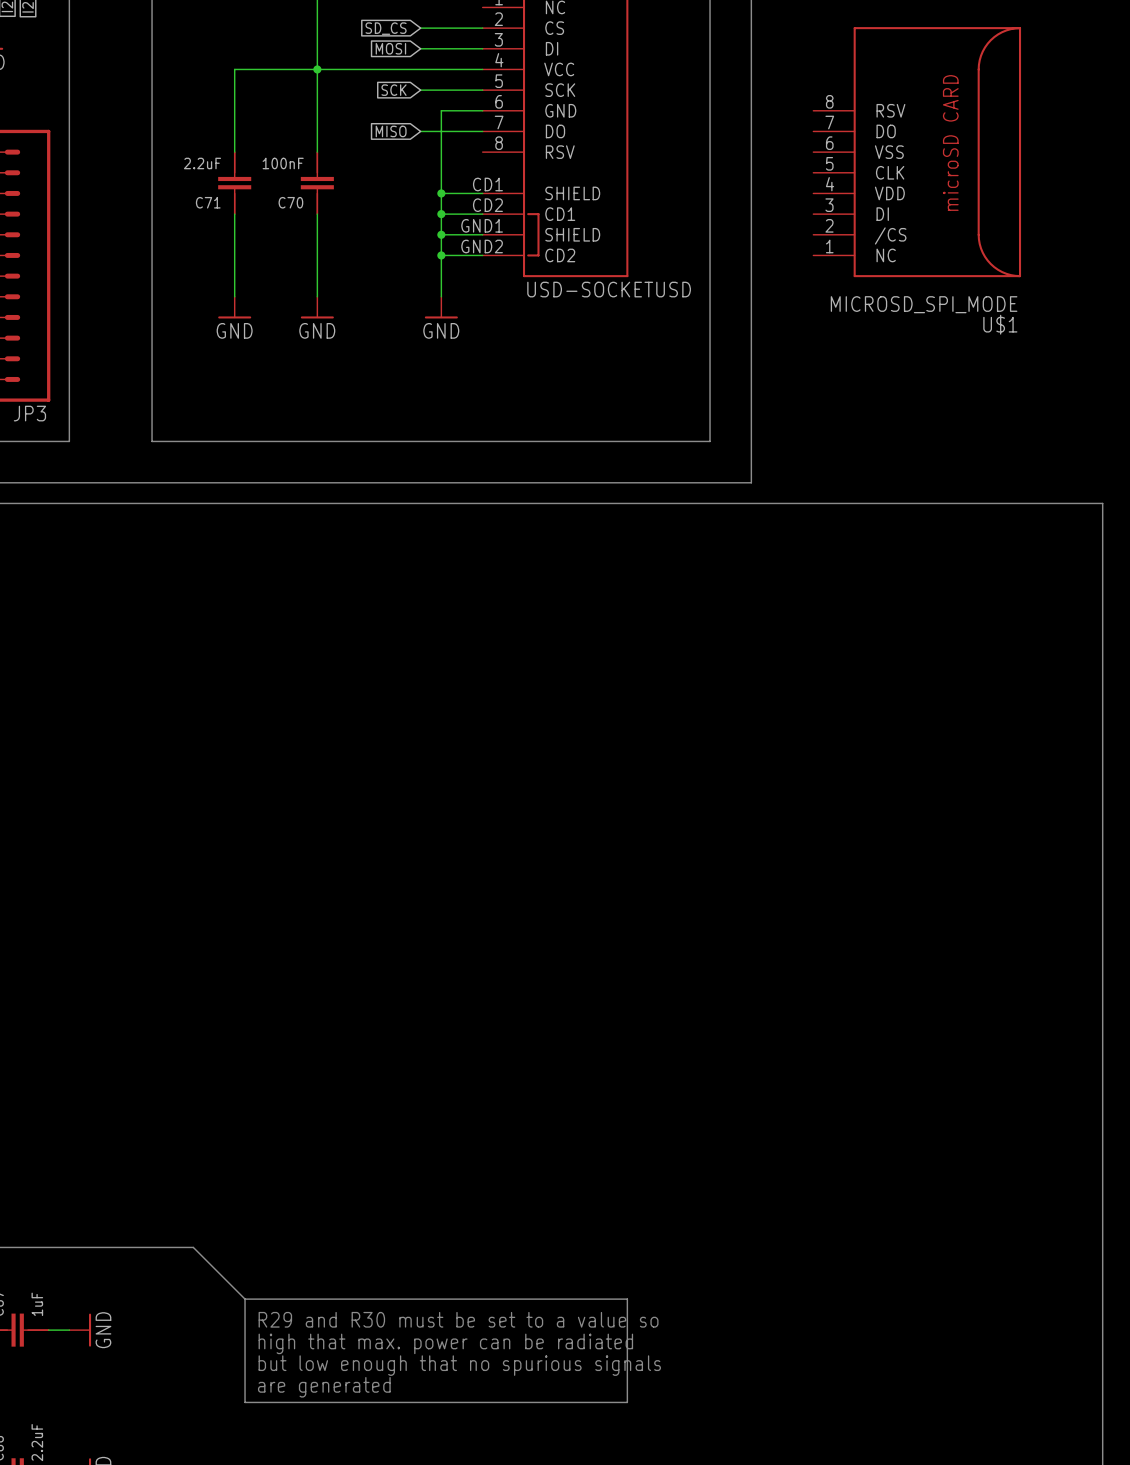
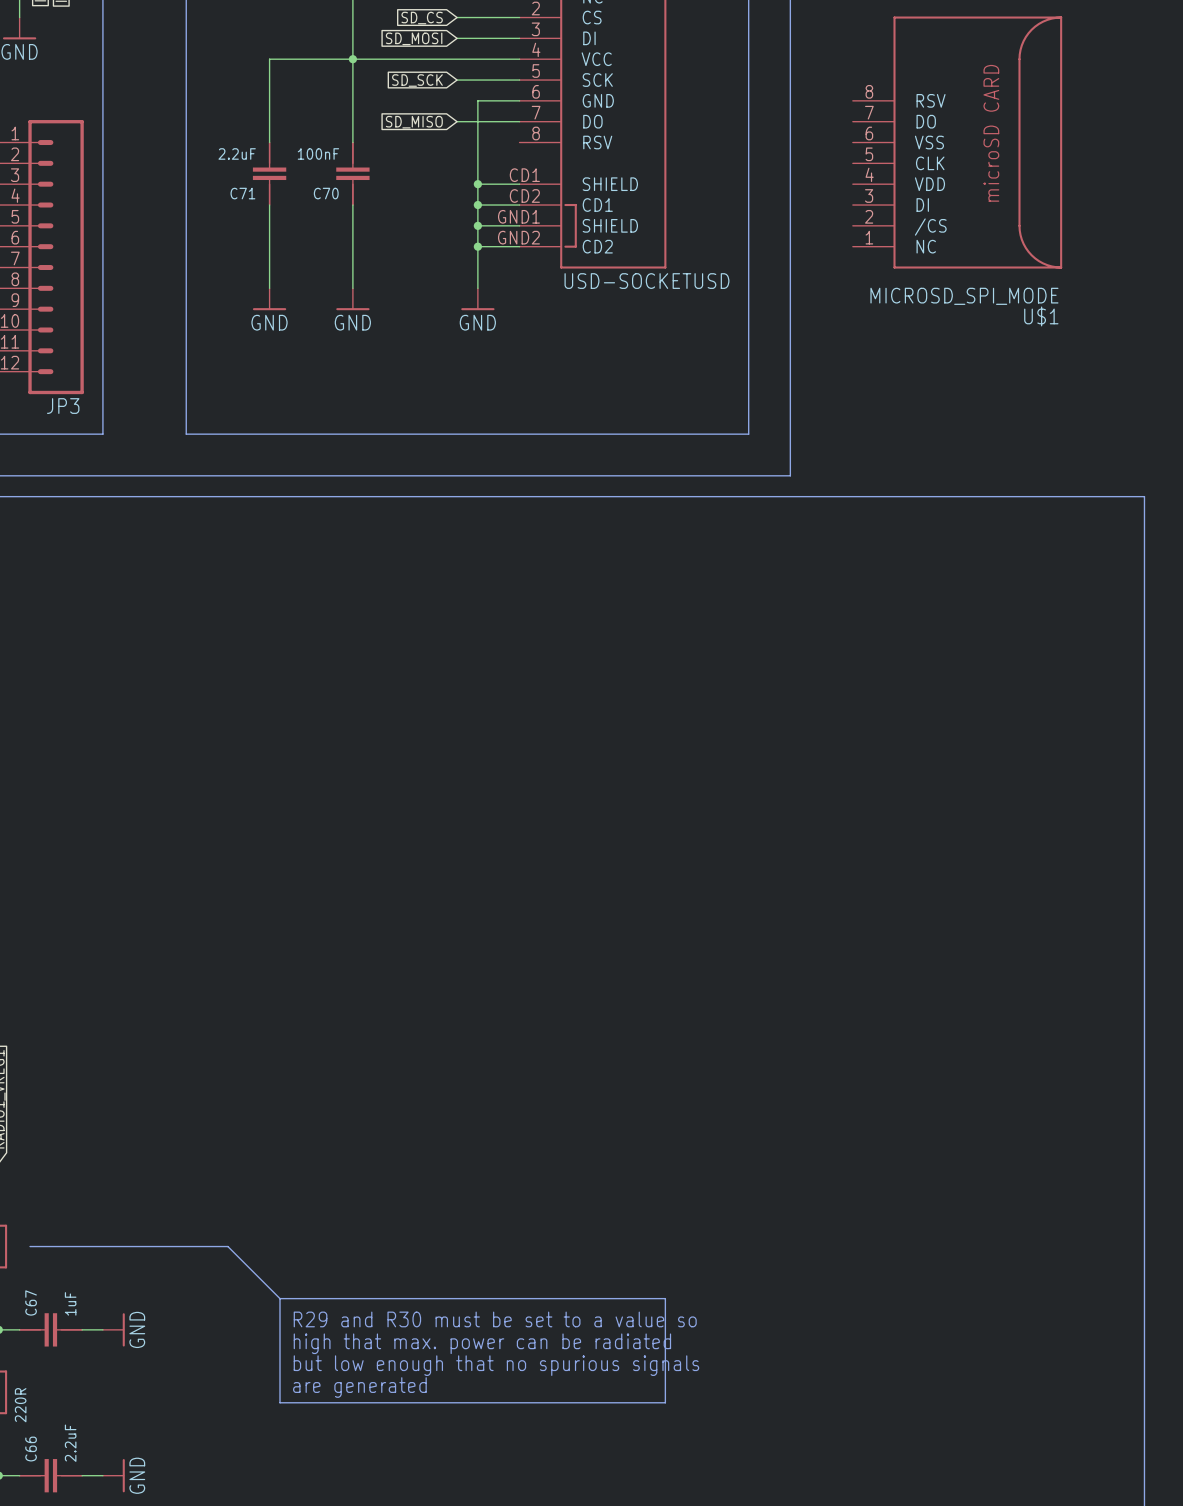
global label: MOSI (390, 48) -> SD_MOSI (414, 38)
global label: SCK (394, 90) -> SD_SCK (417, 80)
global label: MISO (391, 131) -> SD_MISO (414, 122)

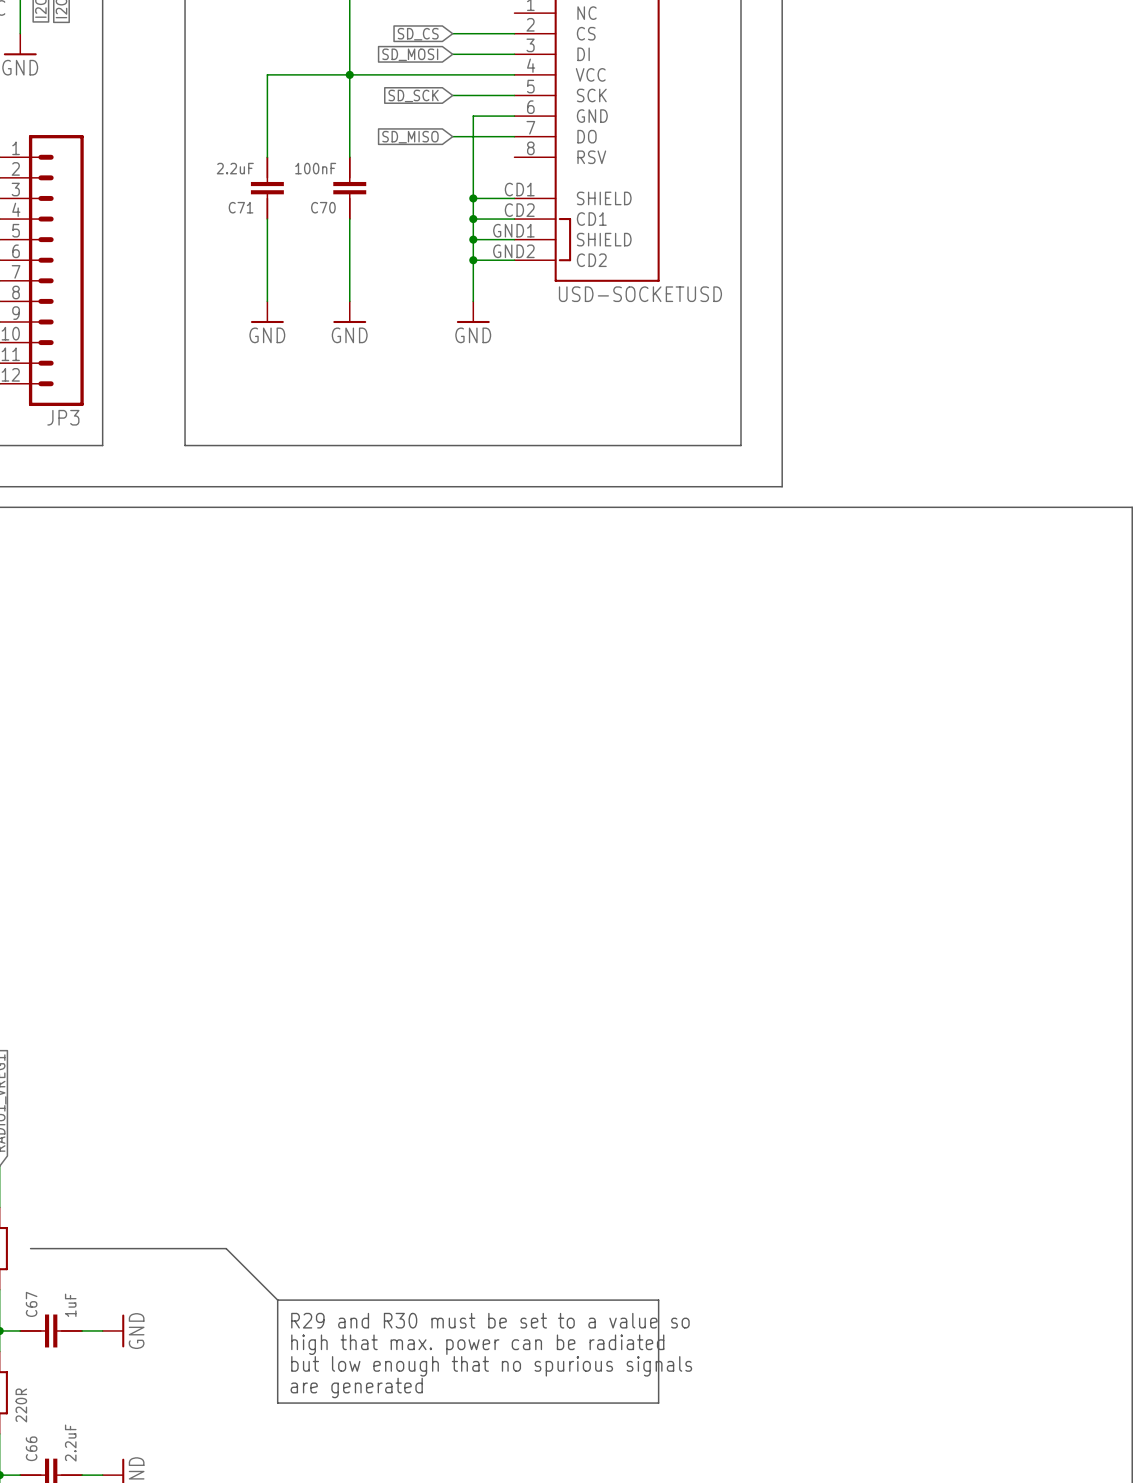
U$1: MICROSD_SPI_MODE (957, 142) -> none

